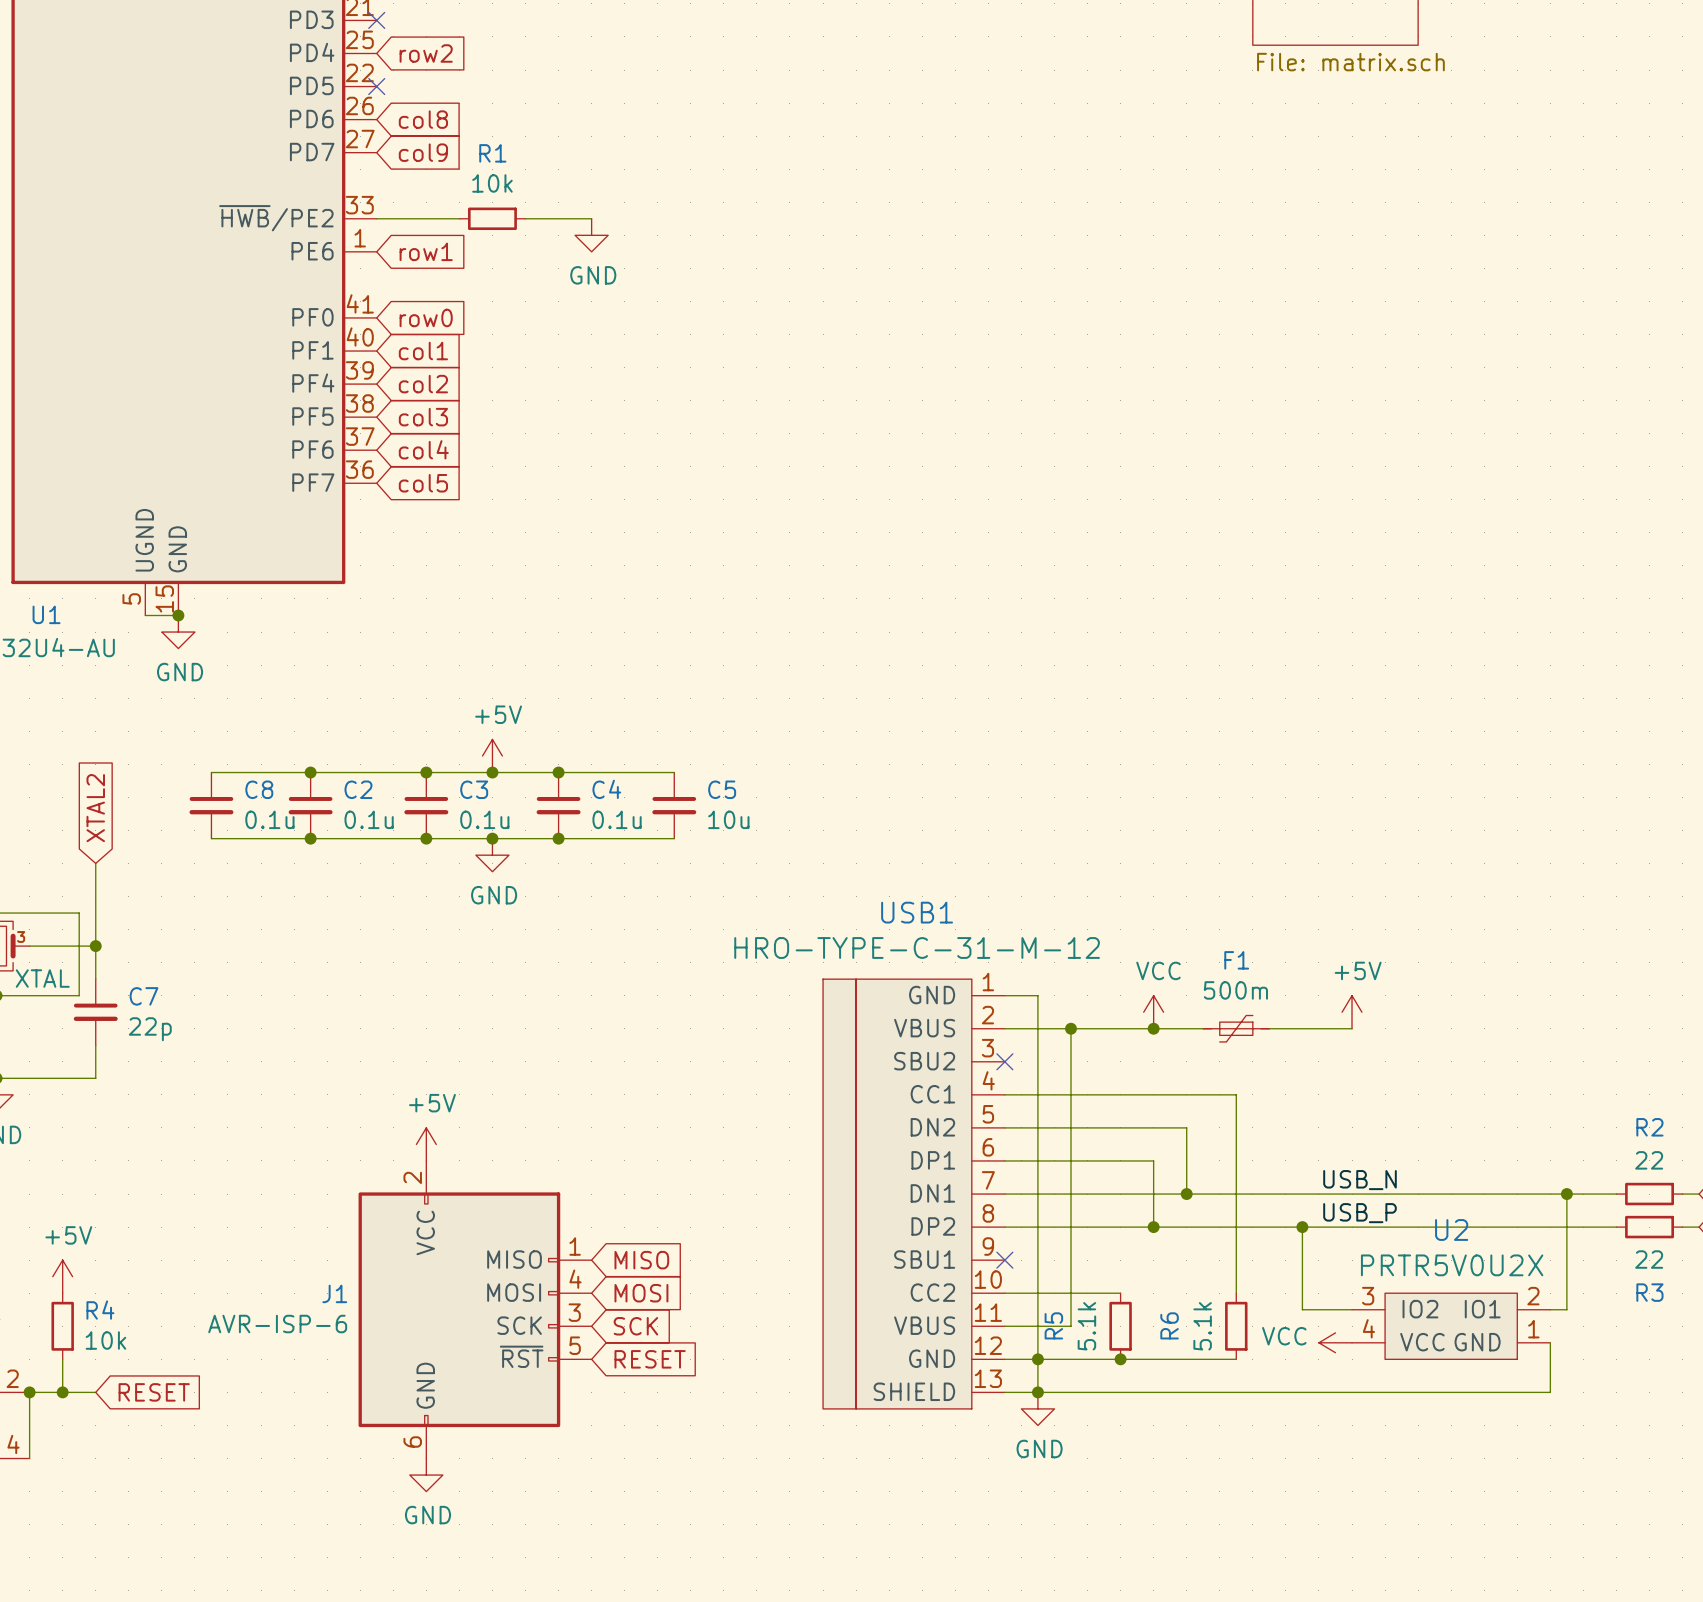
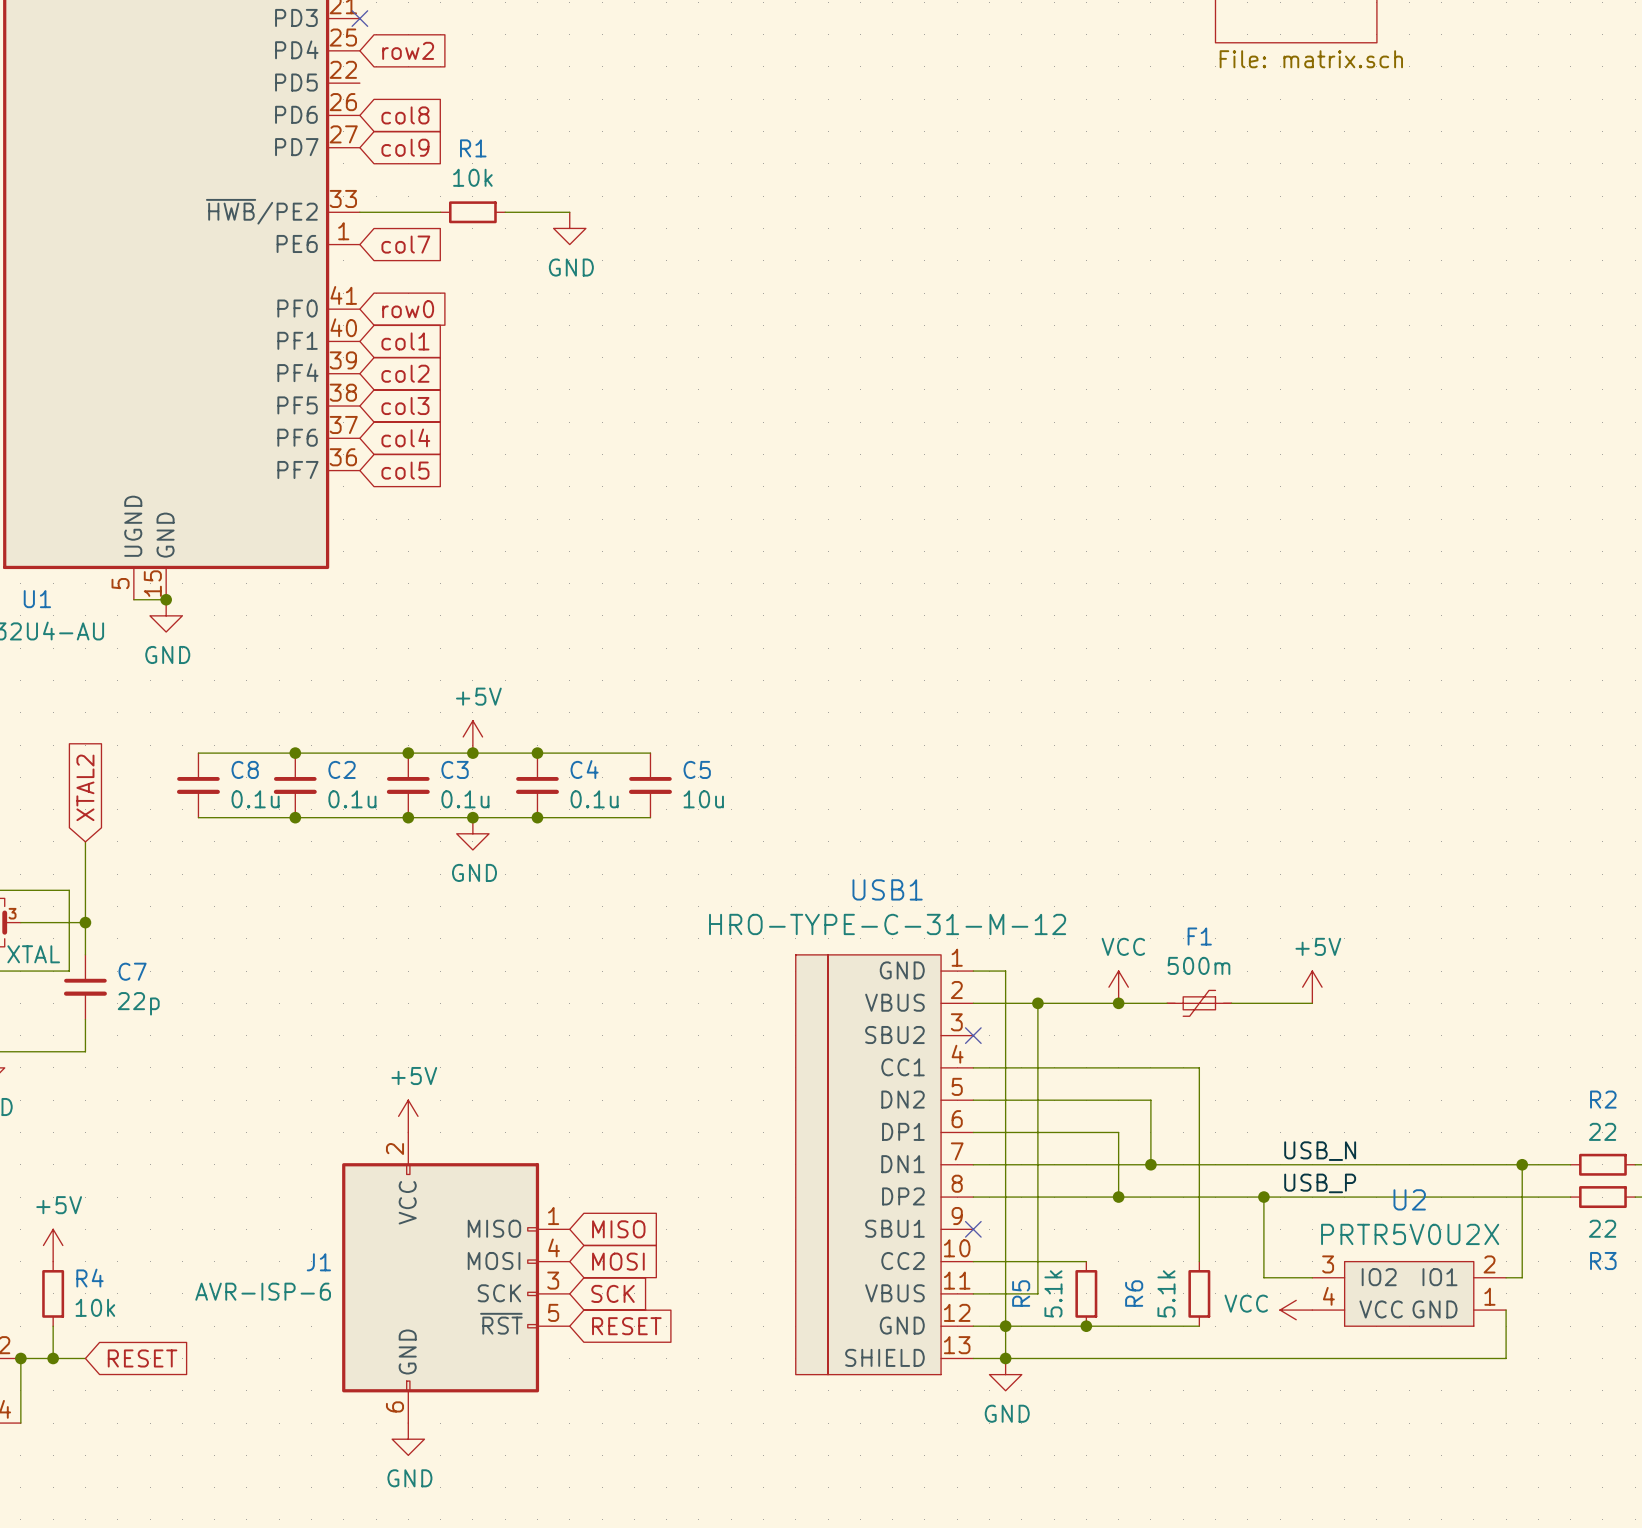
no-connect mark: (376, 86) -> none
global label: row1 (426, 251) -> col7 (405, 244)

